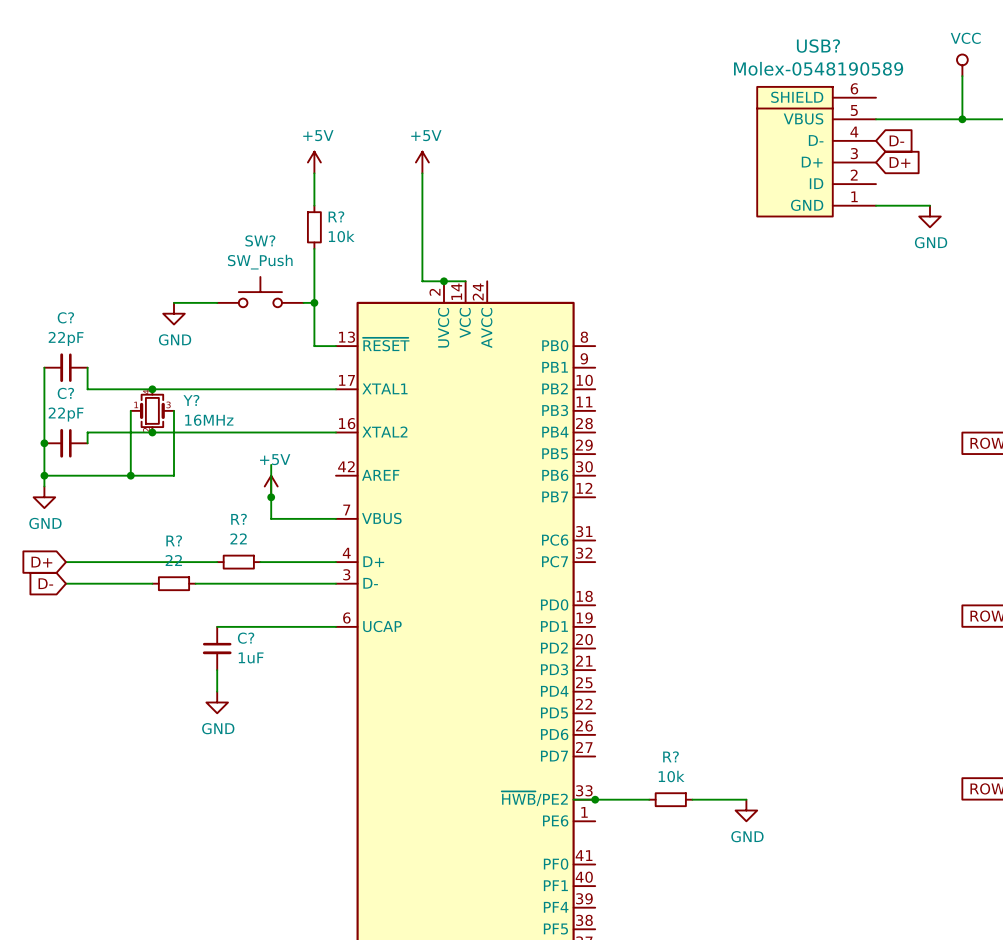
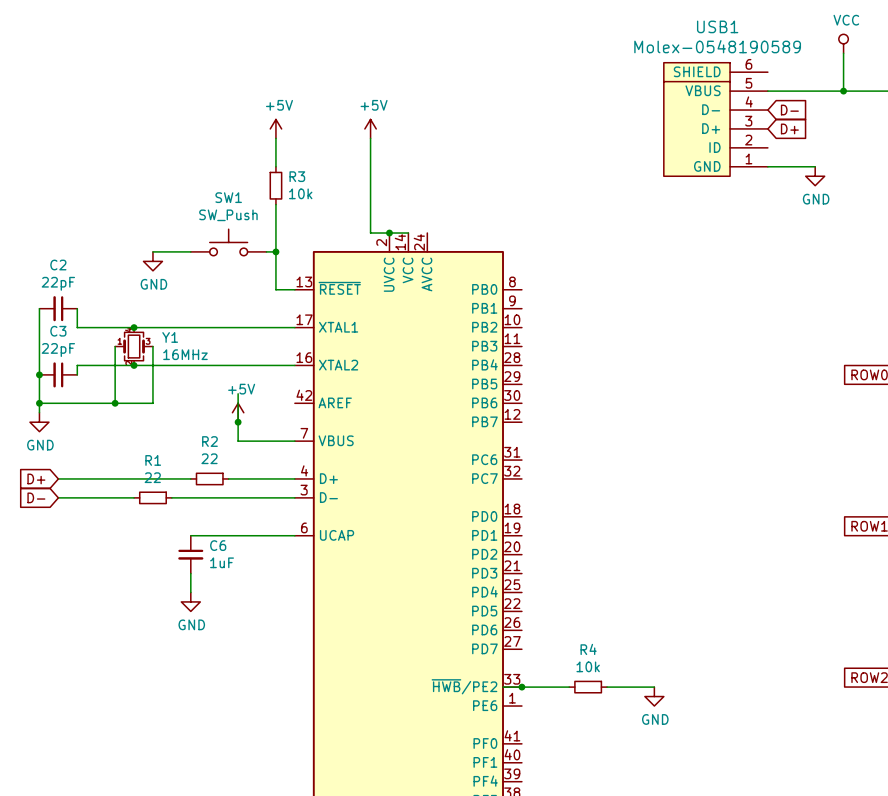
USB? name: USB? (818, 46) -> USB1 (717, 26)
R? name: R? (336, 216) -> R3 (297, 176)
SW? name: SW? (260, 240) -> SW1 (228, 197)
C? name: C? (65, 317) -> C2 (58, 265)
C? name: C? (65, 393) -> C3 (58, 331)
Y? name: Y? (191, 400) -> Y1 (170, 337)
R? name: R? (239, 519) -> R2 (209, 441)
R? name: R? (174, 540) -> R1 (153, 460)
C? name: C? (246, 638) -> C6 (218, 545)
R? name: R? (671, 756) -> R4 (588, 649)

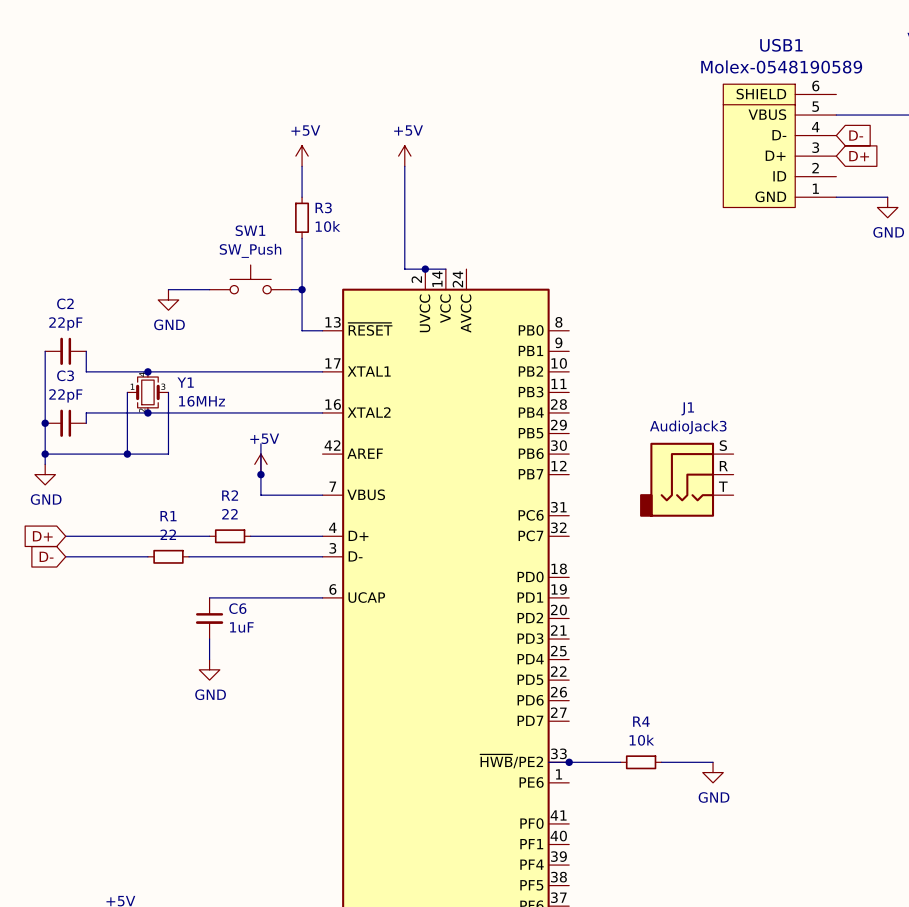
J1: none -> AudioJack3 (686, 479)

